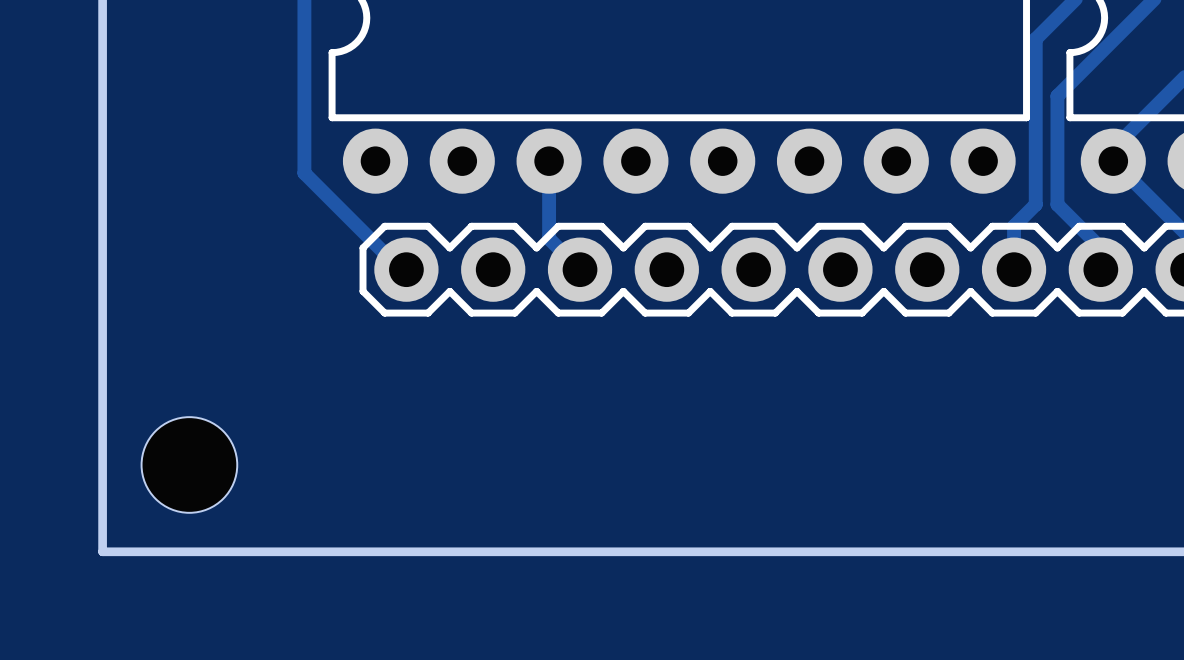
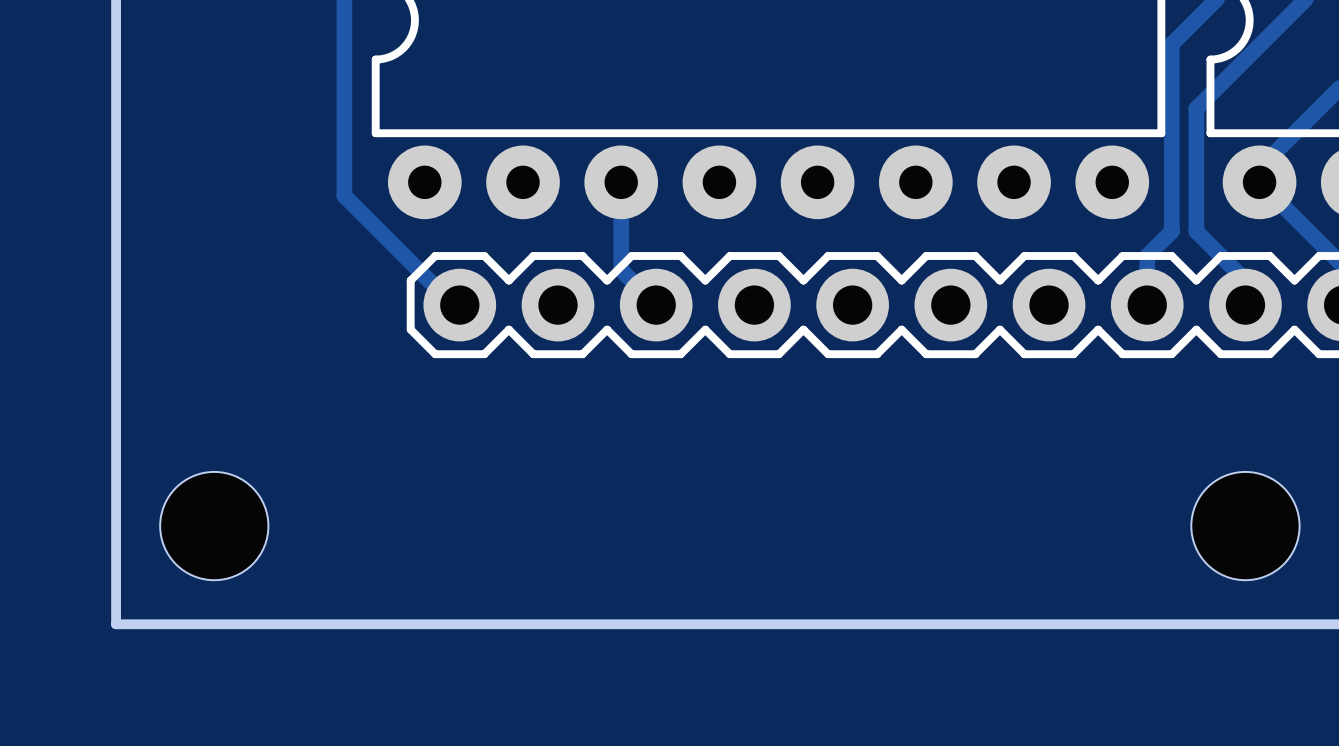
hole: none -> (1245, 526)

